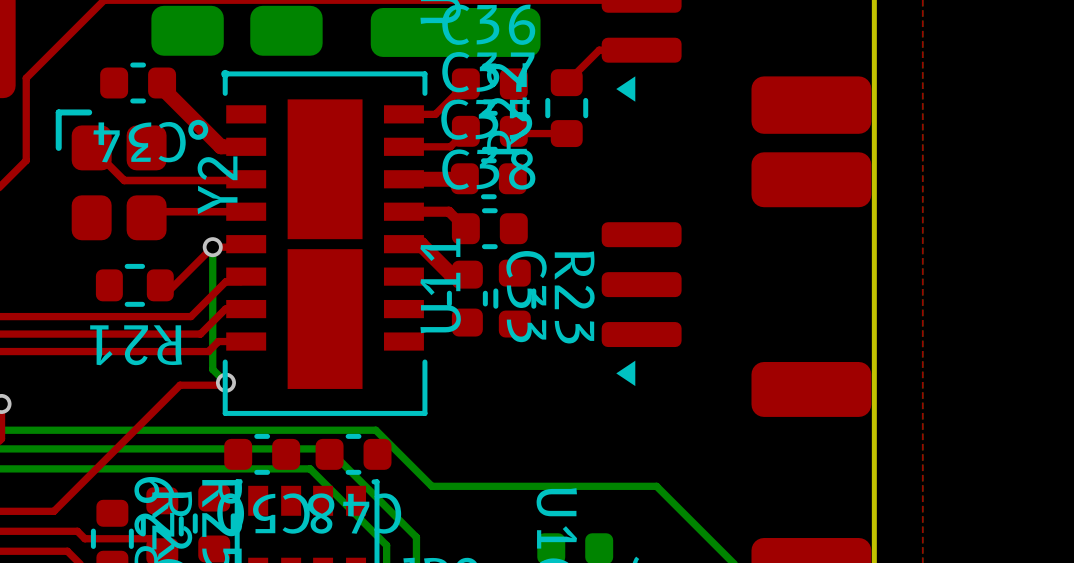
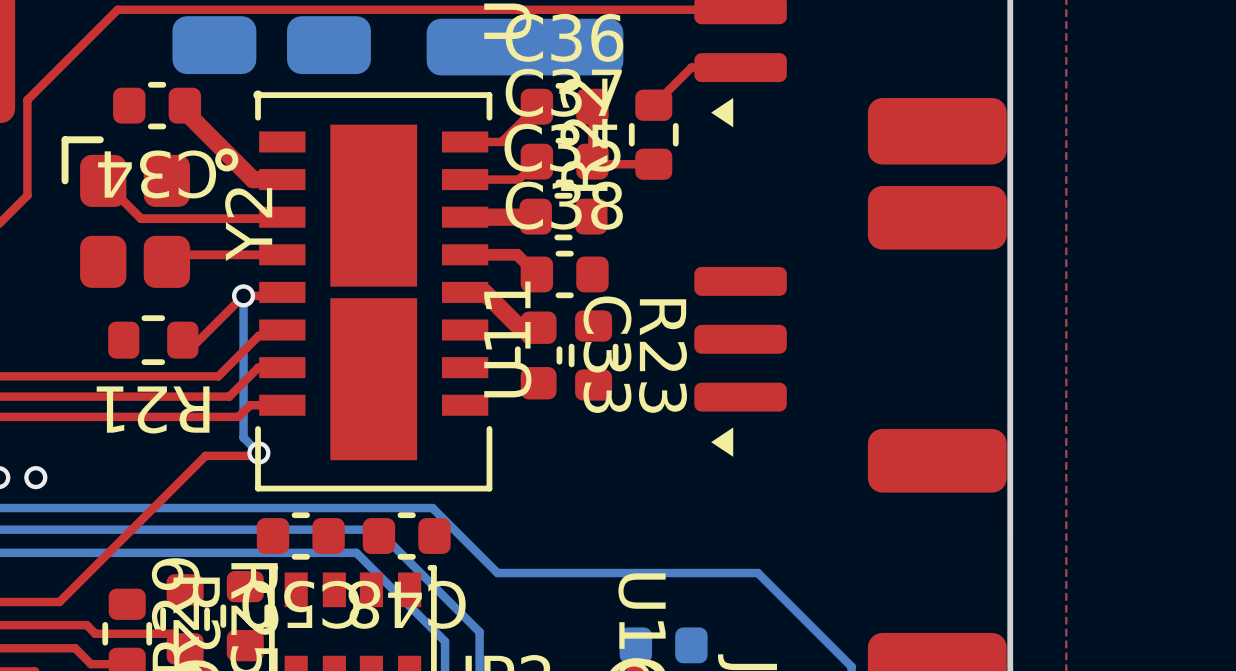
via: none -> (35, 477)

